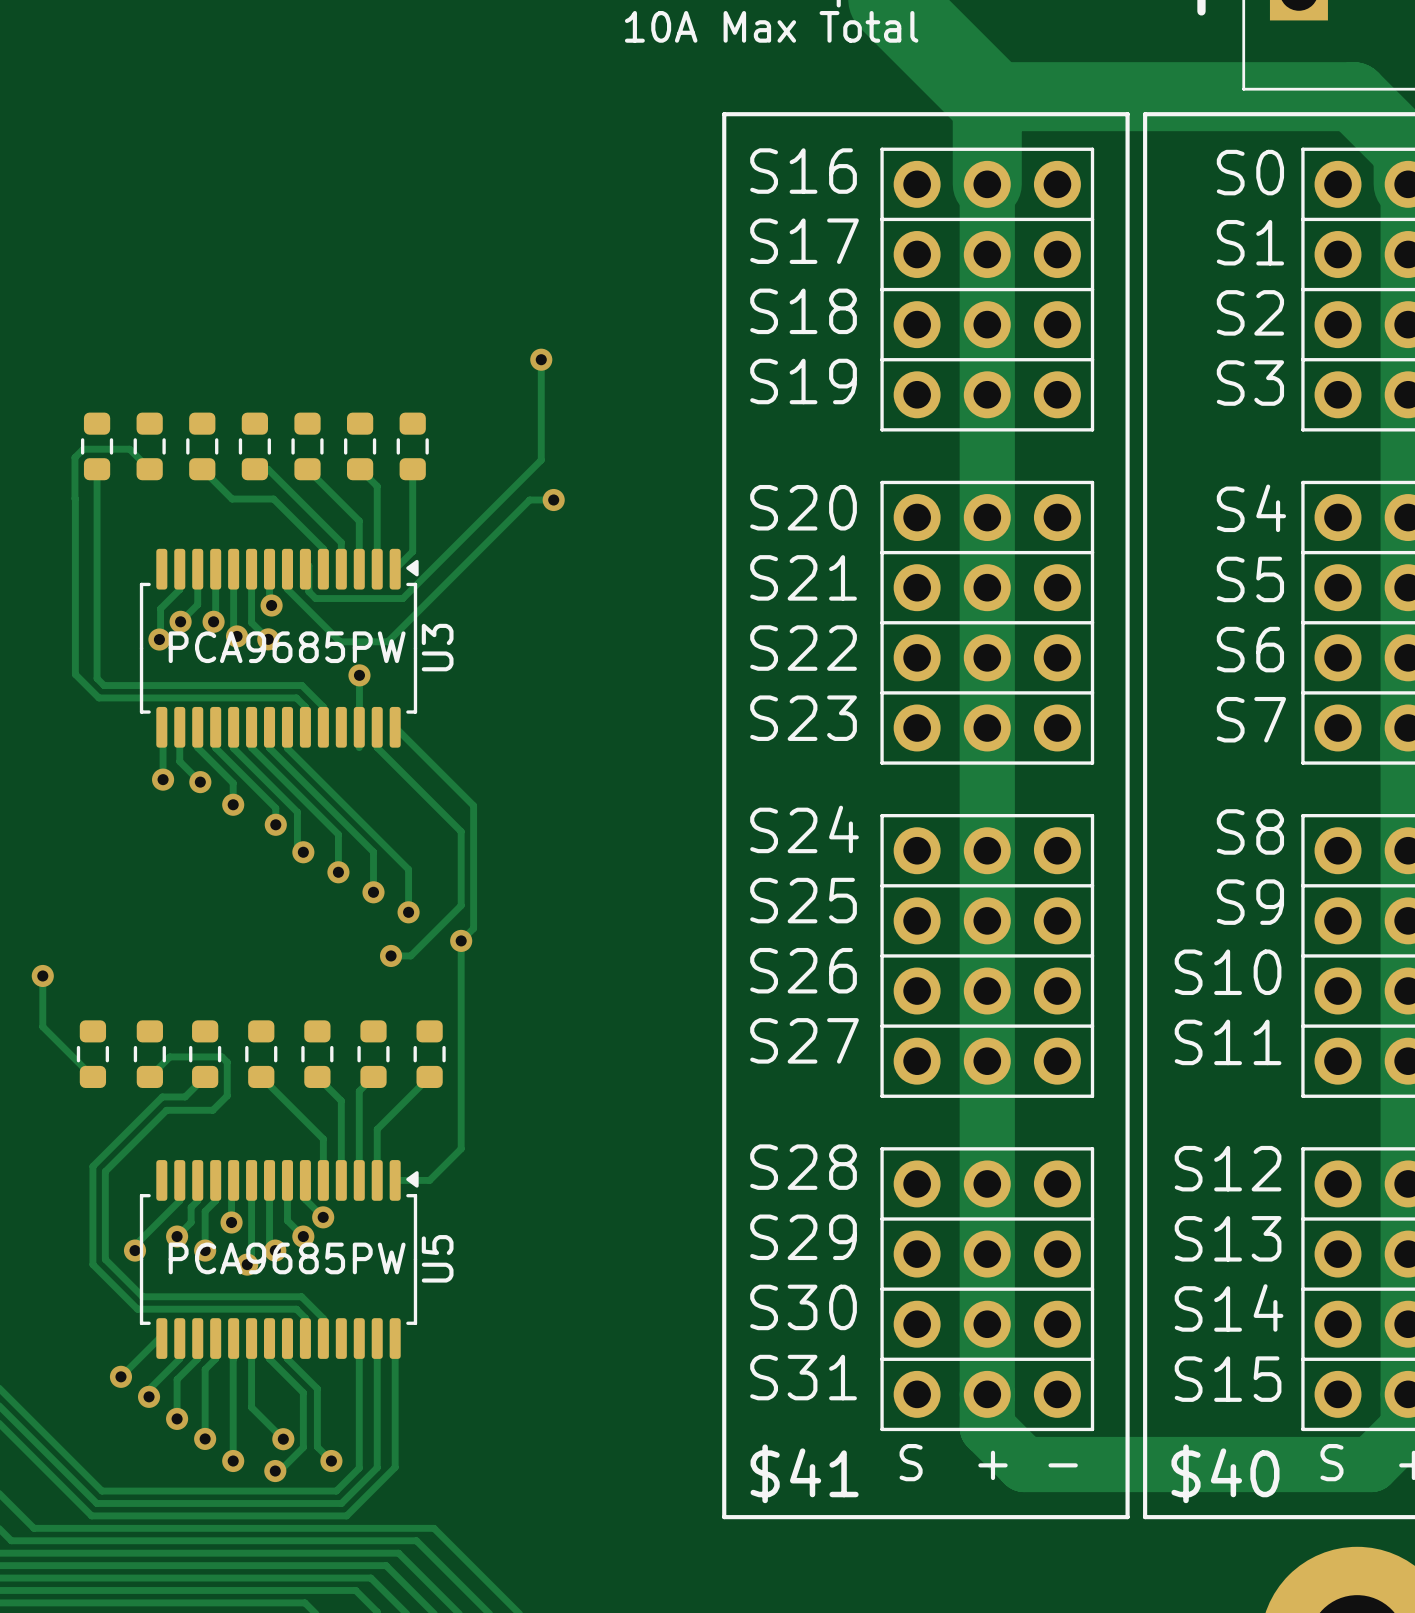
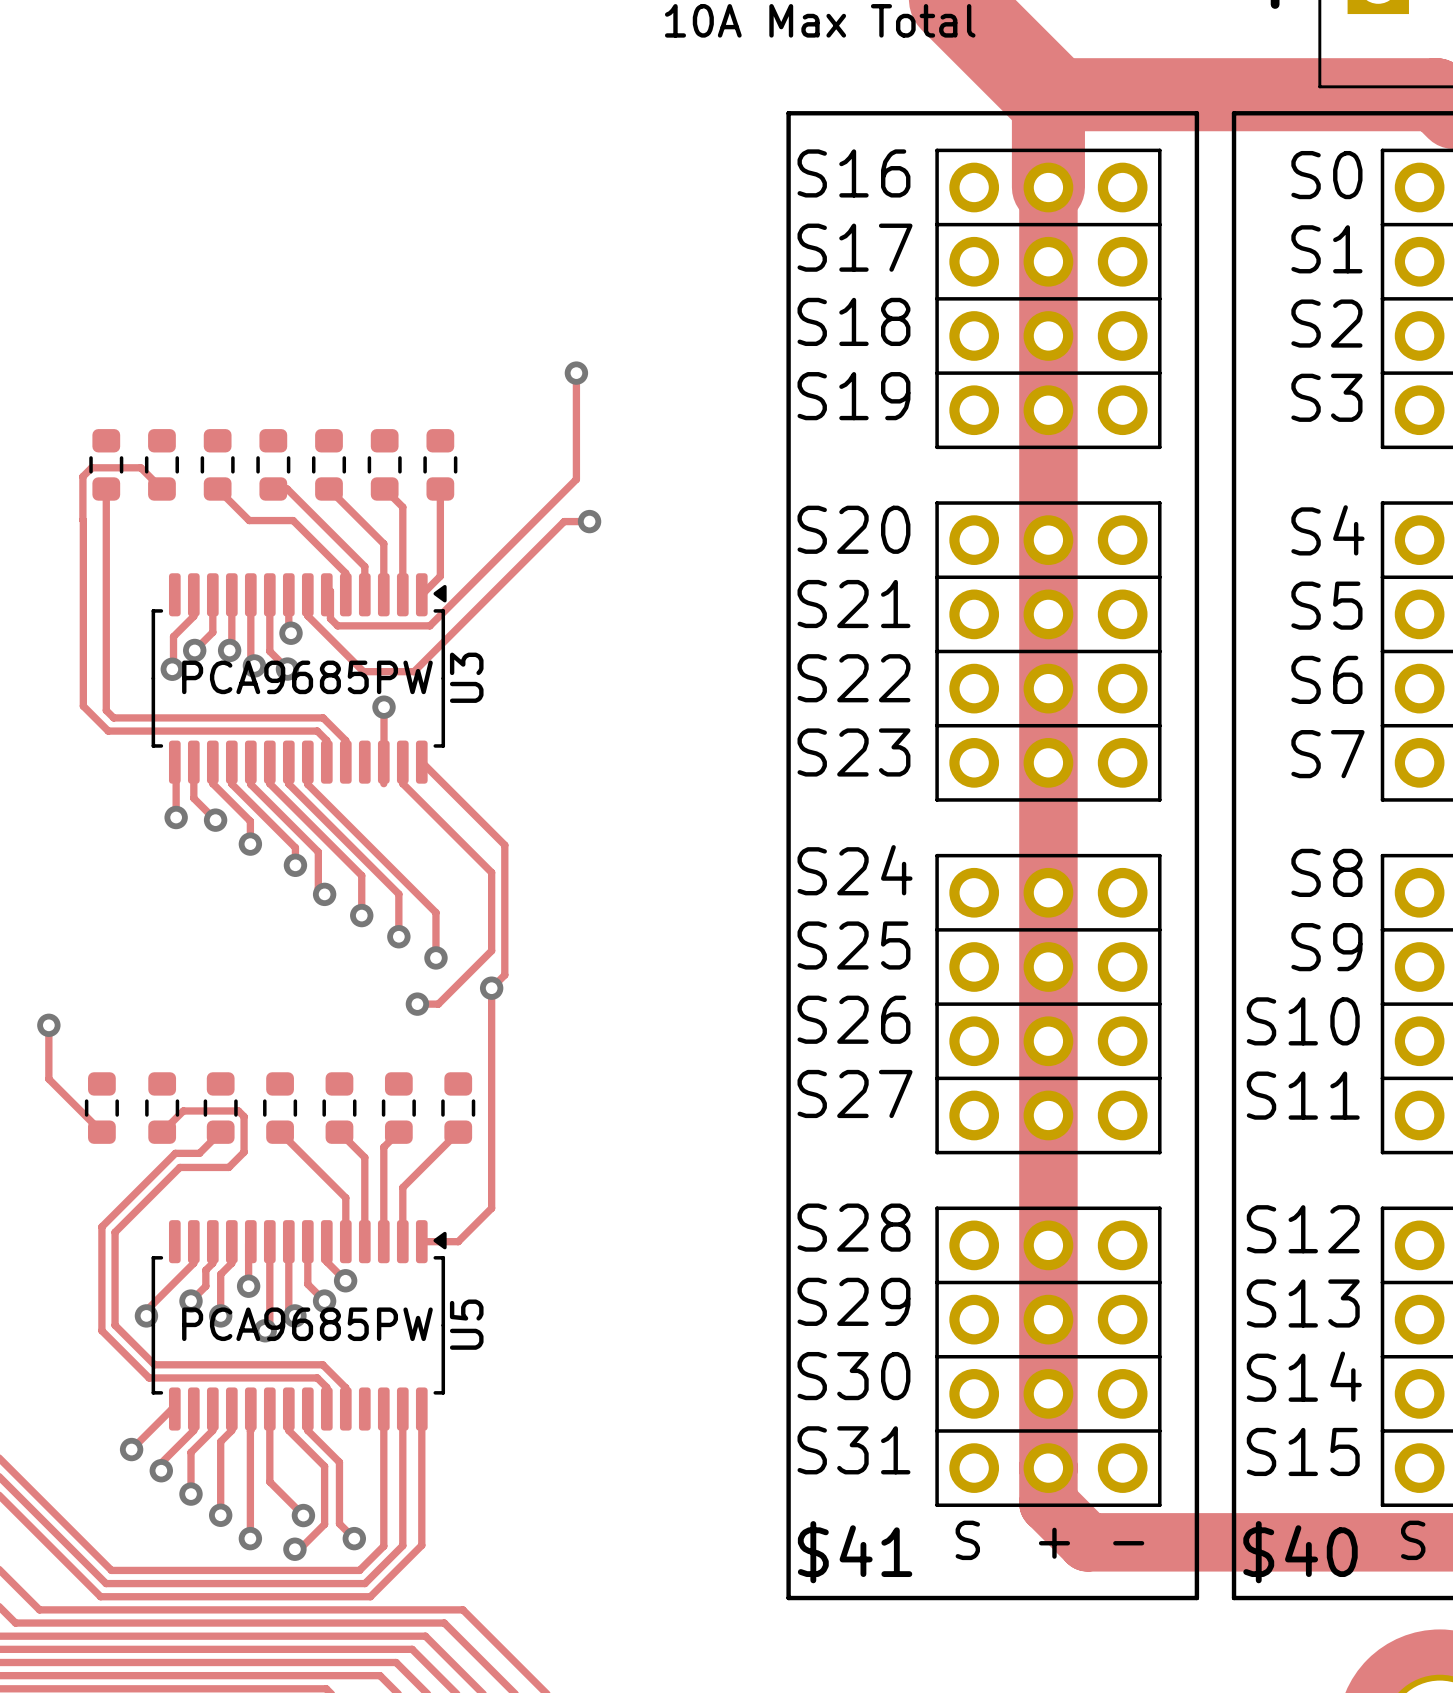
line: (741, 114) (724, 114) (724, 1517) (741, 1517) -> (788, 113) (788, 1598)
line: (1162, 114) (1145, 114) (1145, 1517) (1162, 1517) -> (1234, 113) (1234, 1598)

